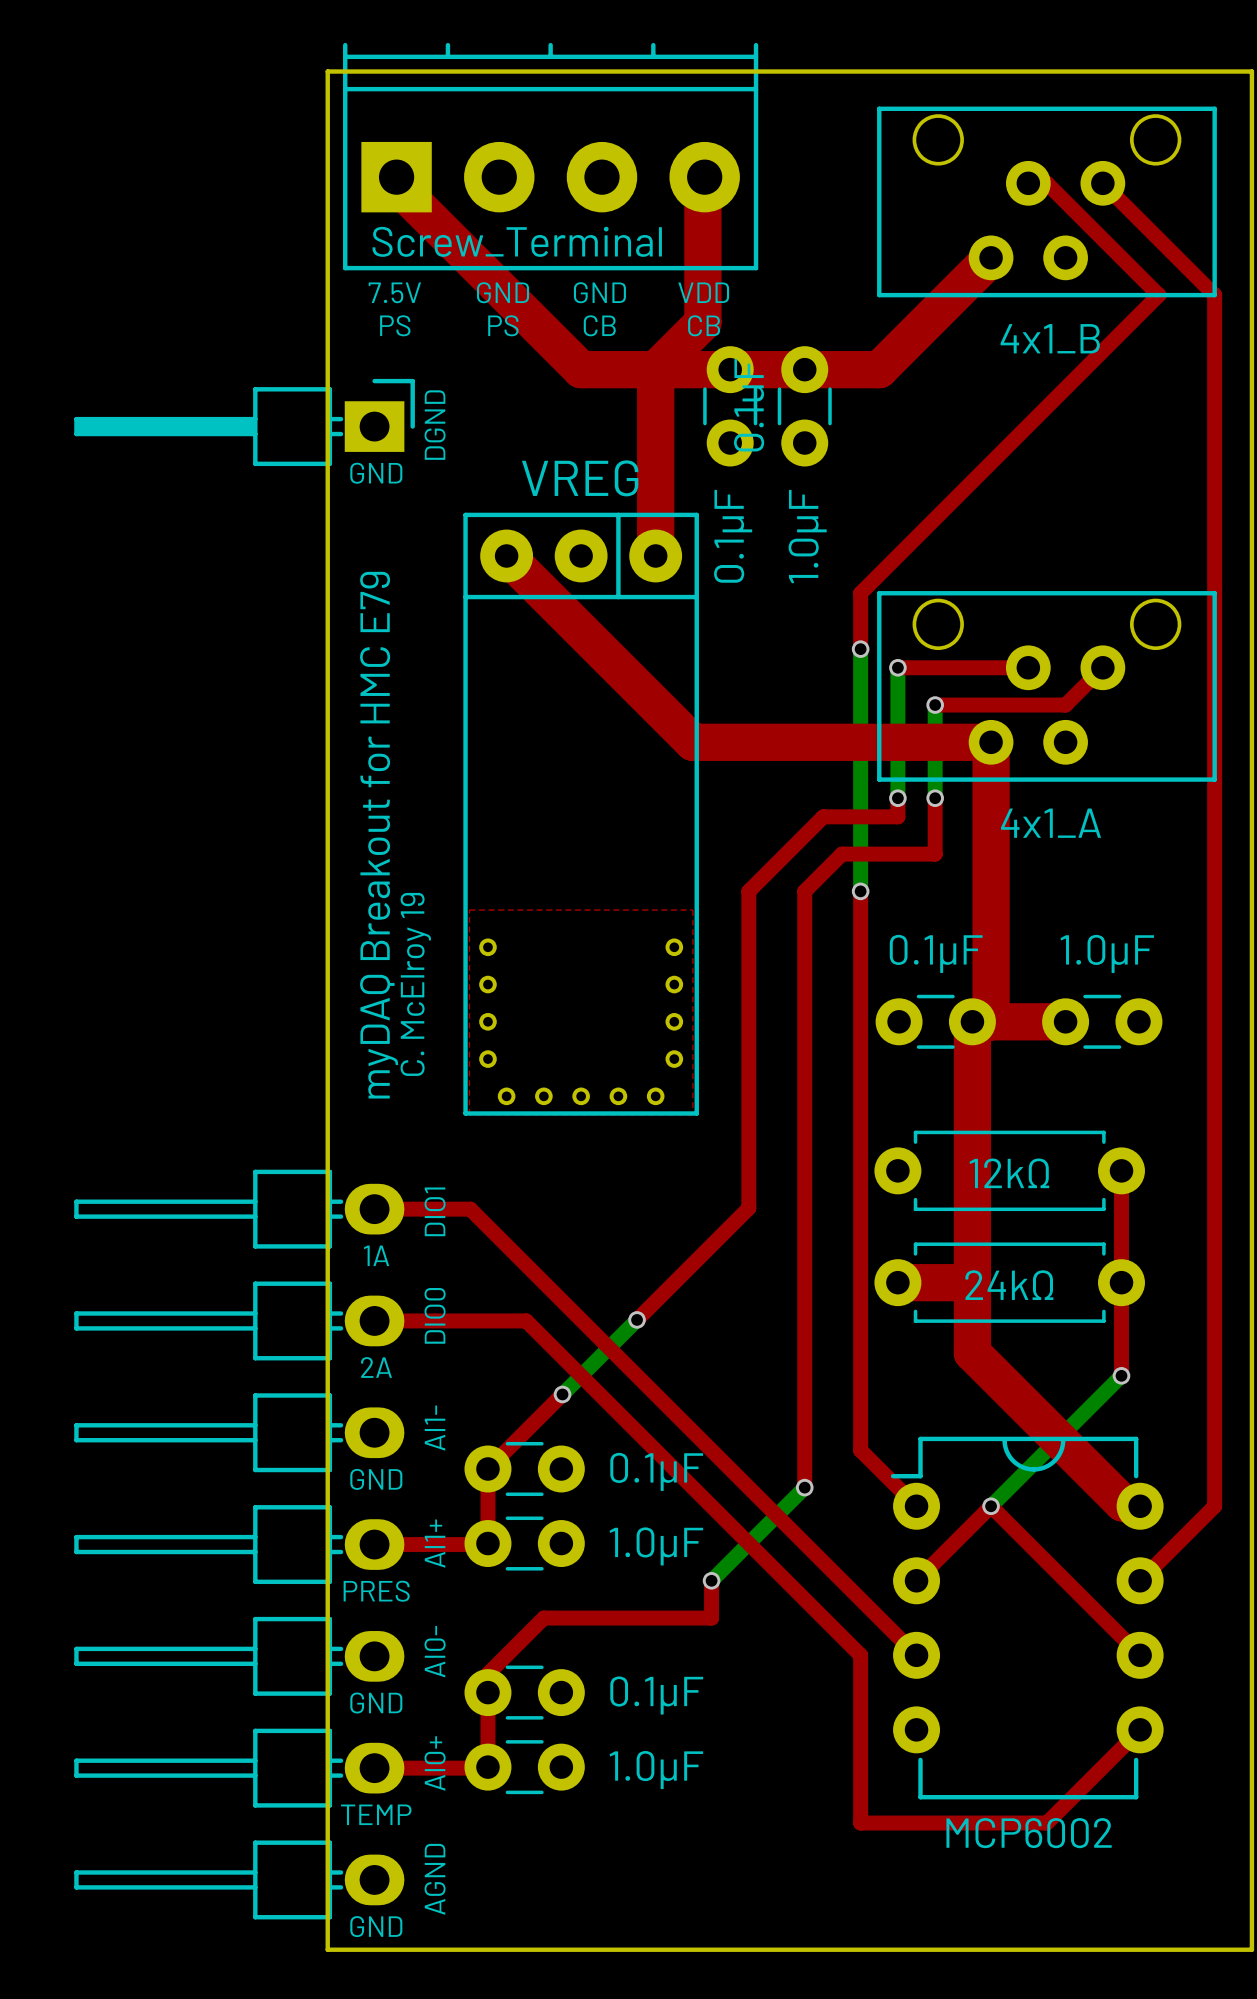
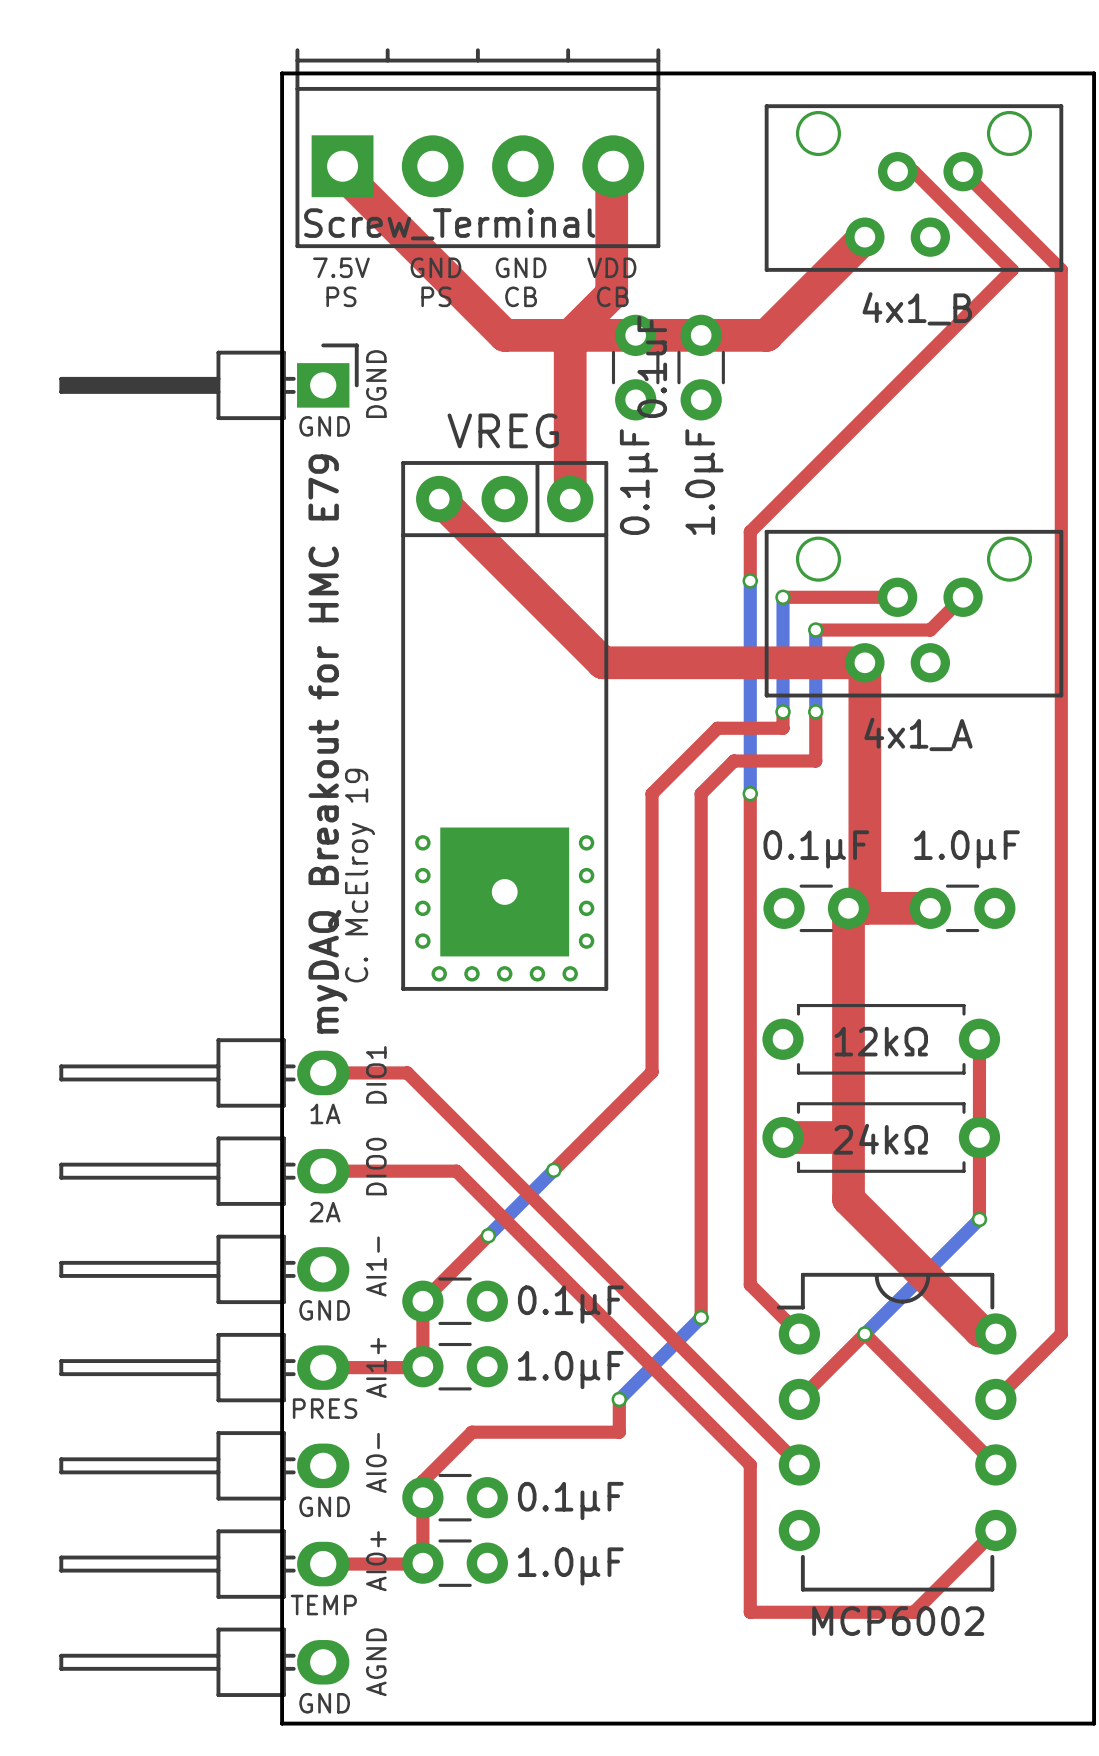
VREG footprint: [463, 512, 699, 1116] -> [401, 461, 609, 991]
top zone outline: (469, 910) (692, 910) (692, 1114) (469, 1114) (469, 910) -> none

